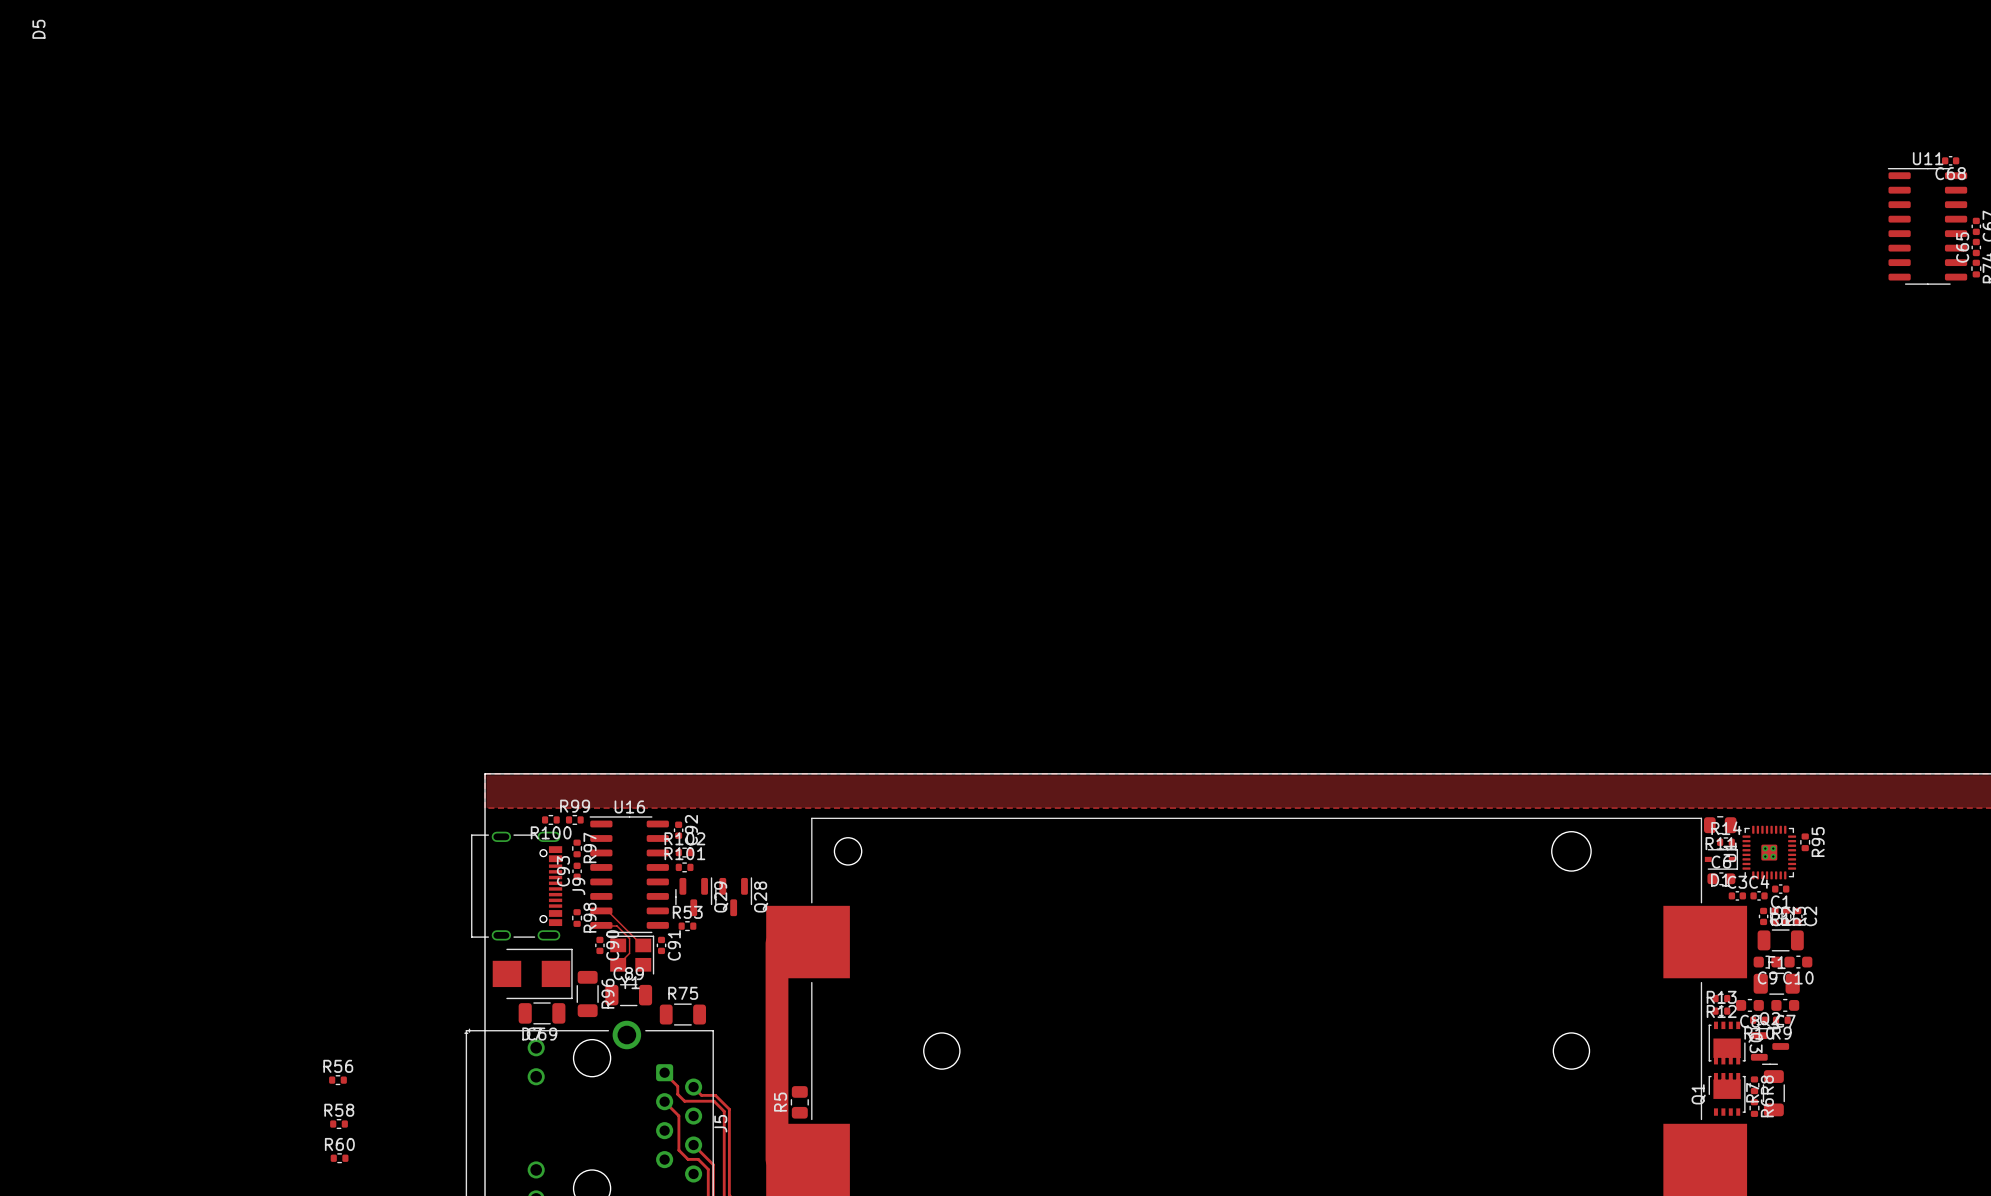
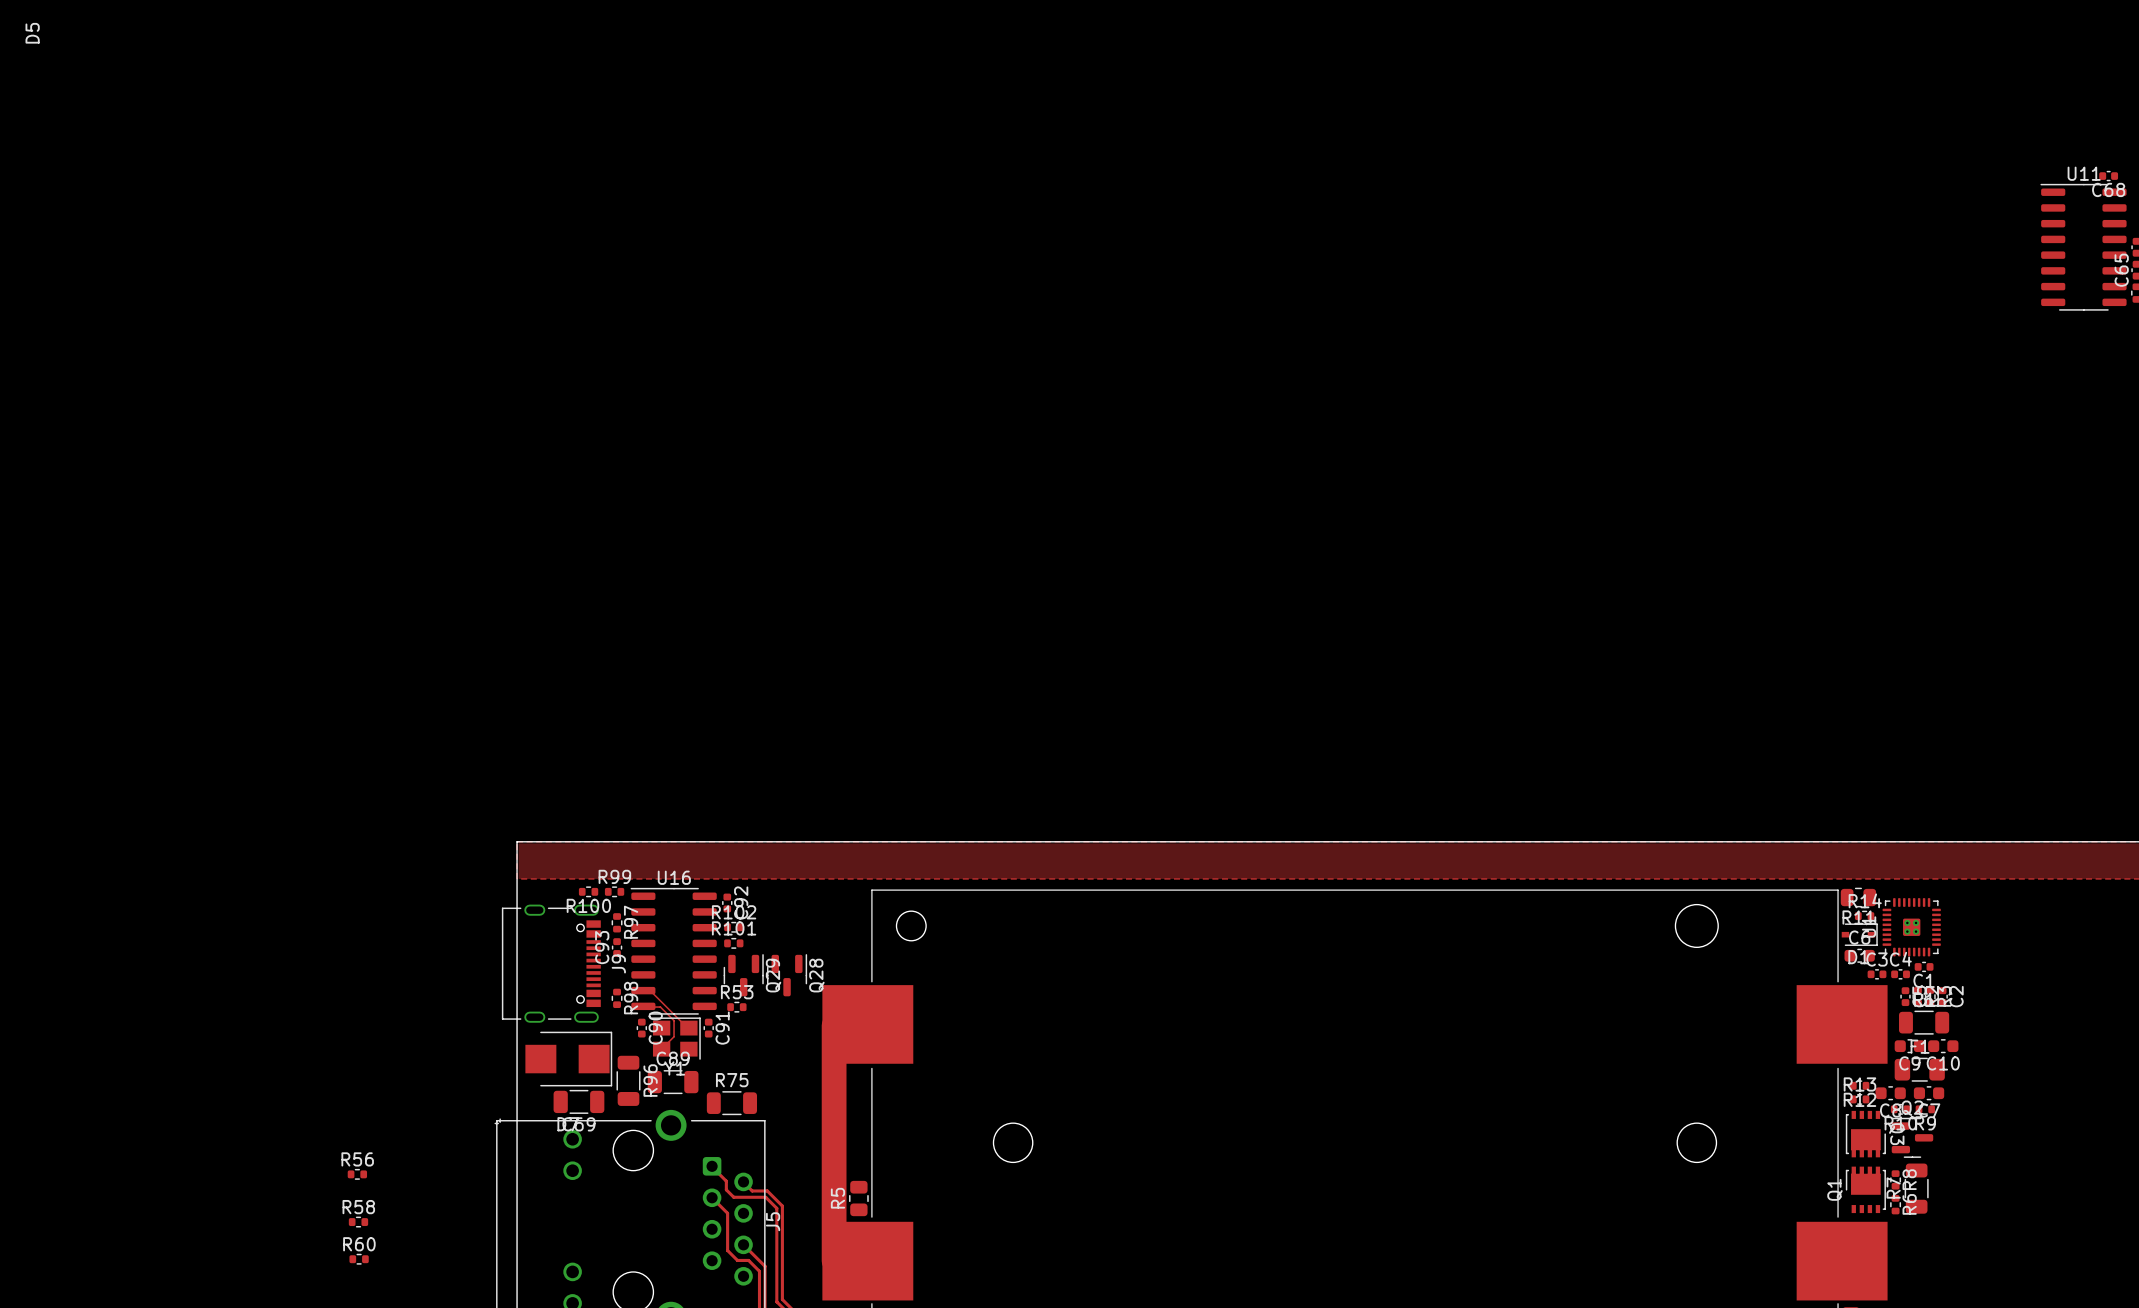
R95: (1805, 842) -> none

